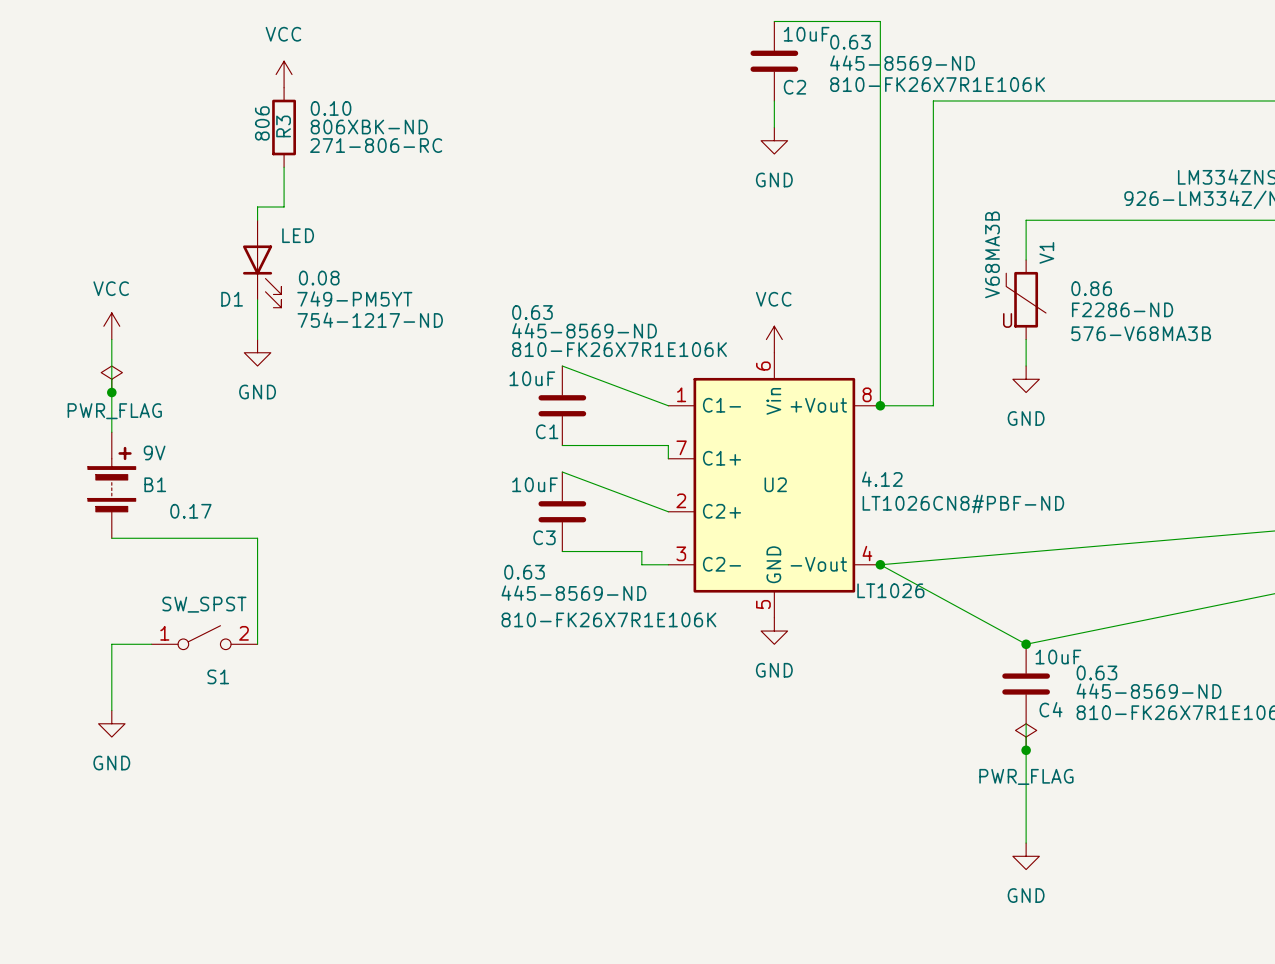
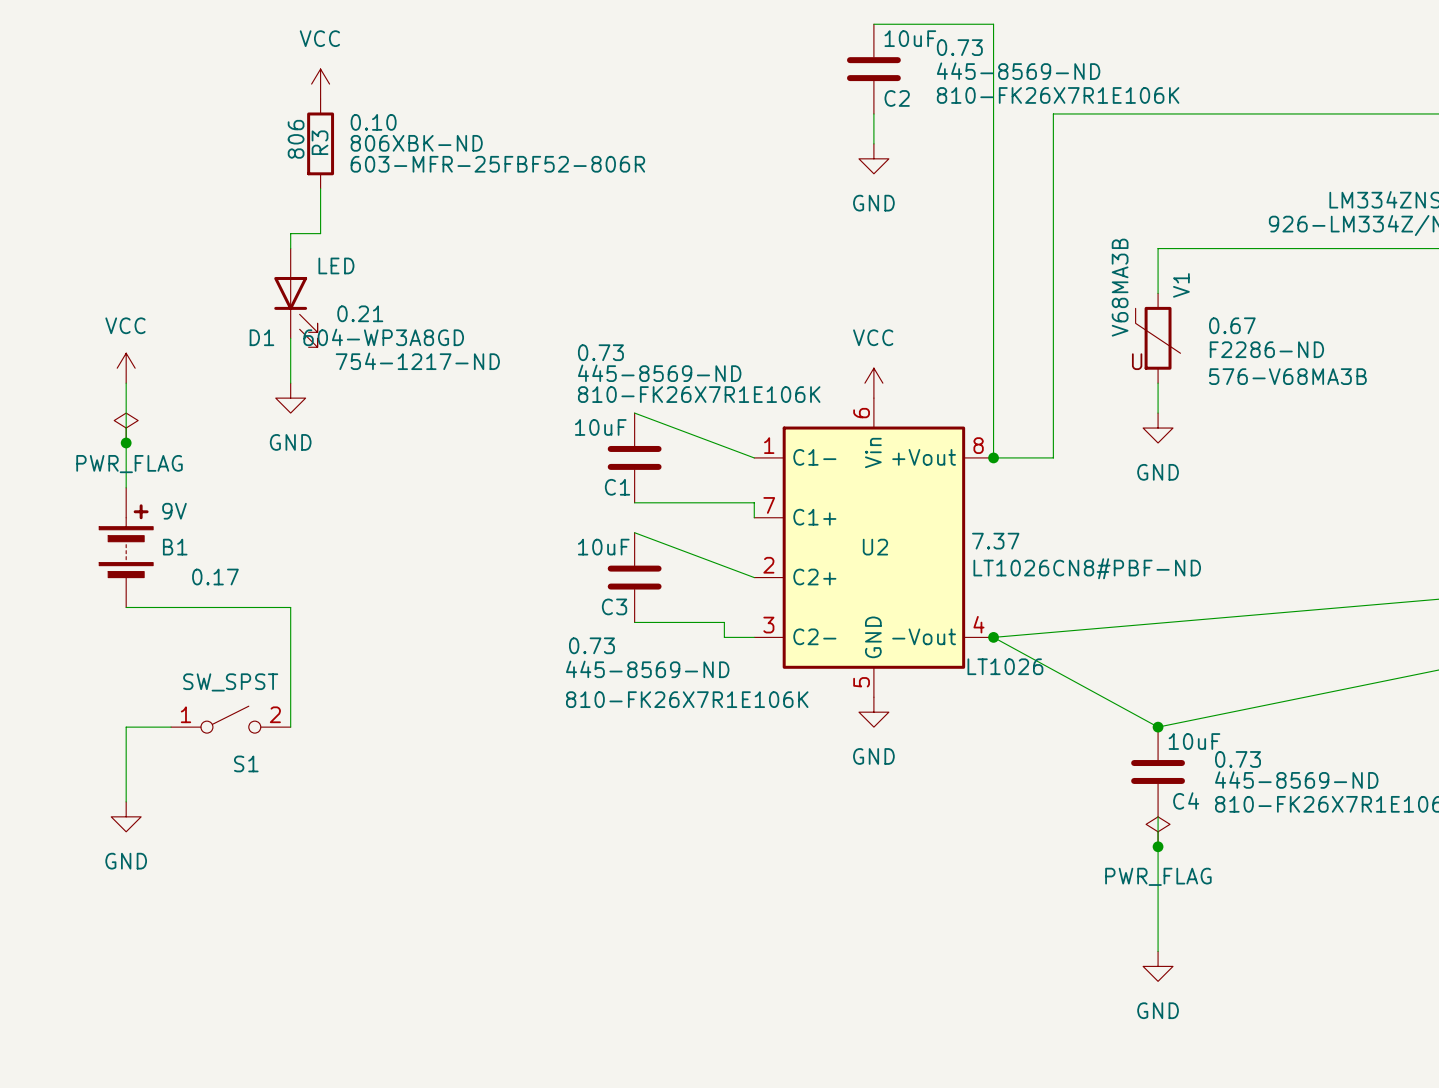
C2 text: 0.63 (850, 42) -> 0.73 (959, 47)
R3 text: 271-806-RC (376, 145) -> 603-MFR-25FBF52-806R (497, 164)
D1 text: 0.08 (319, 278) -> 0.21 (360, 313)
V1 text: 0.86 (1091, 288) -> 0.67 (1232, 325)
D1 text: 749-PM5YT (354, 298) -> 604-WP3A8GD (383, 337)
C1 text: 0.63 (532, 312) -> 0.73 (600, 352)
U2 text: 4.12 (882, 479) -> 7.37 (995, 541)
C3 text: 0.63 (524, 572) -> 0.73 (591, 645)
C4 text: 0.63 (1096, 672) -> 0.73 (1238, 759)

